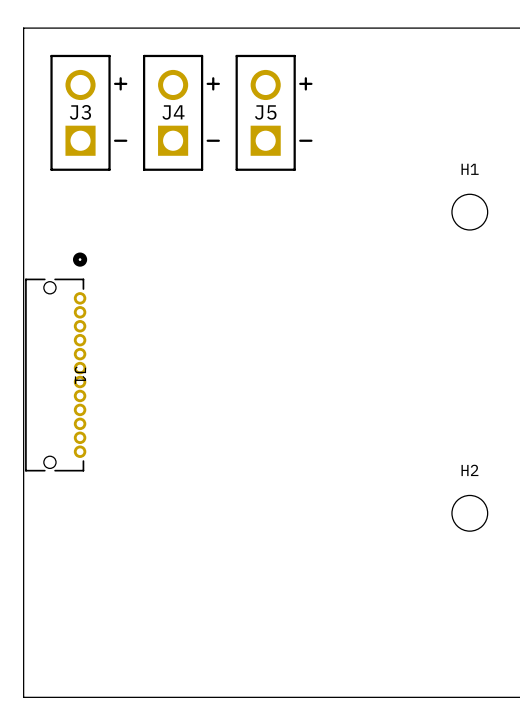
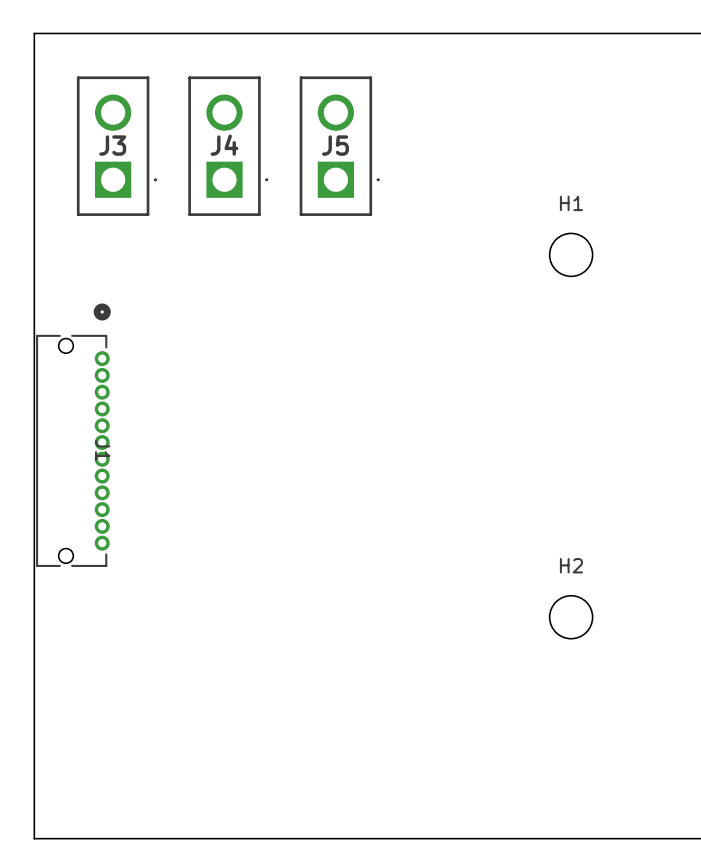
J3 footprint: [50, 54, 128, 171] -> [76, 76, 157, 216]
J4 footprint: [142, 54, 220, 171] -> [188, 76, 269, 216]
J5 footprint: [235, 54, 313, 171] -> [299, 76, 380, 216]

